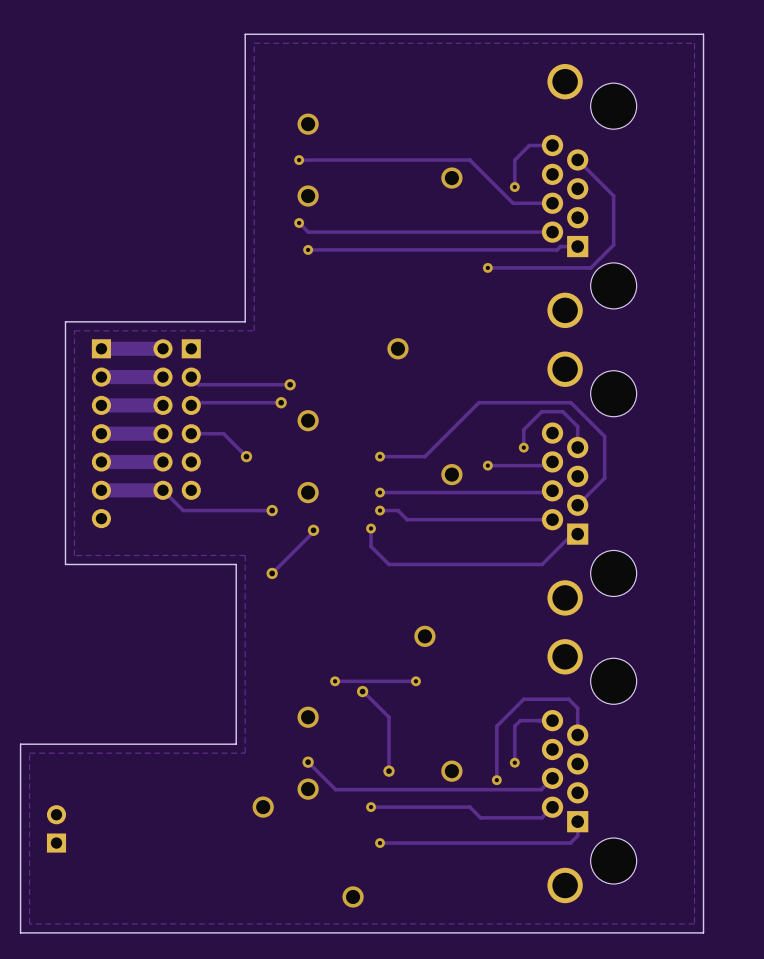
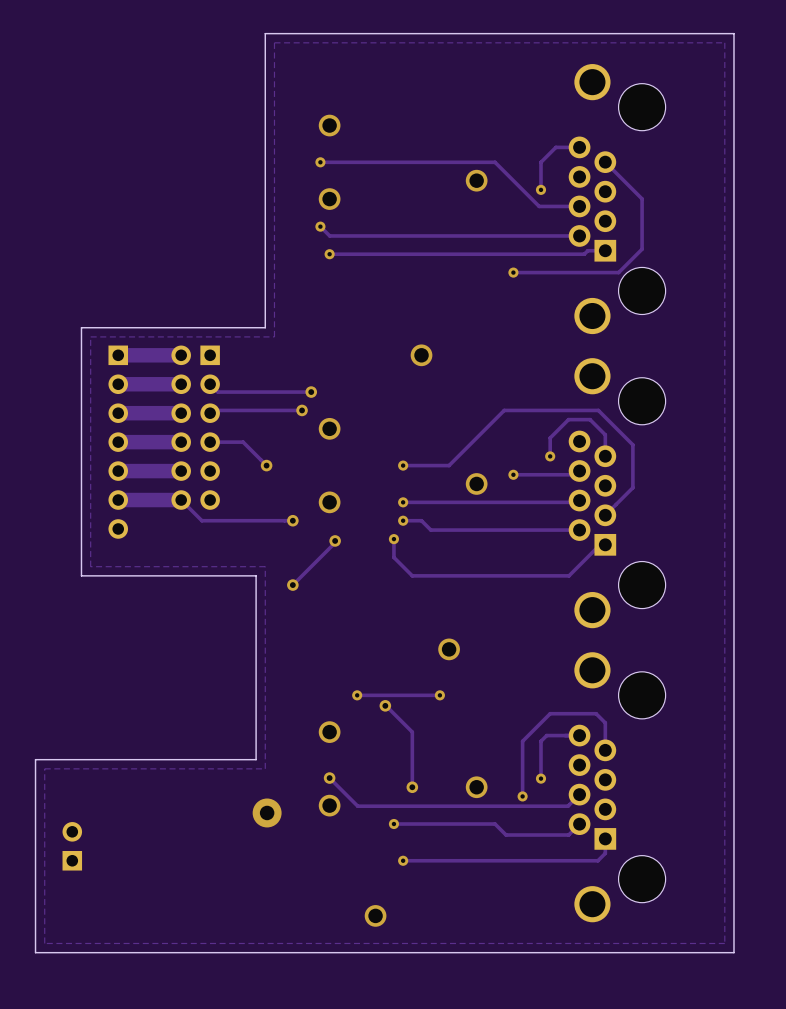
via: none -> (267, 812)
via: (263, 807) -> none

